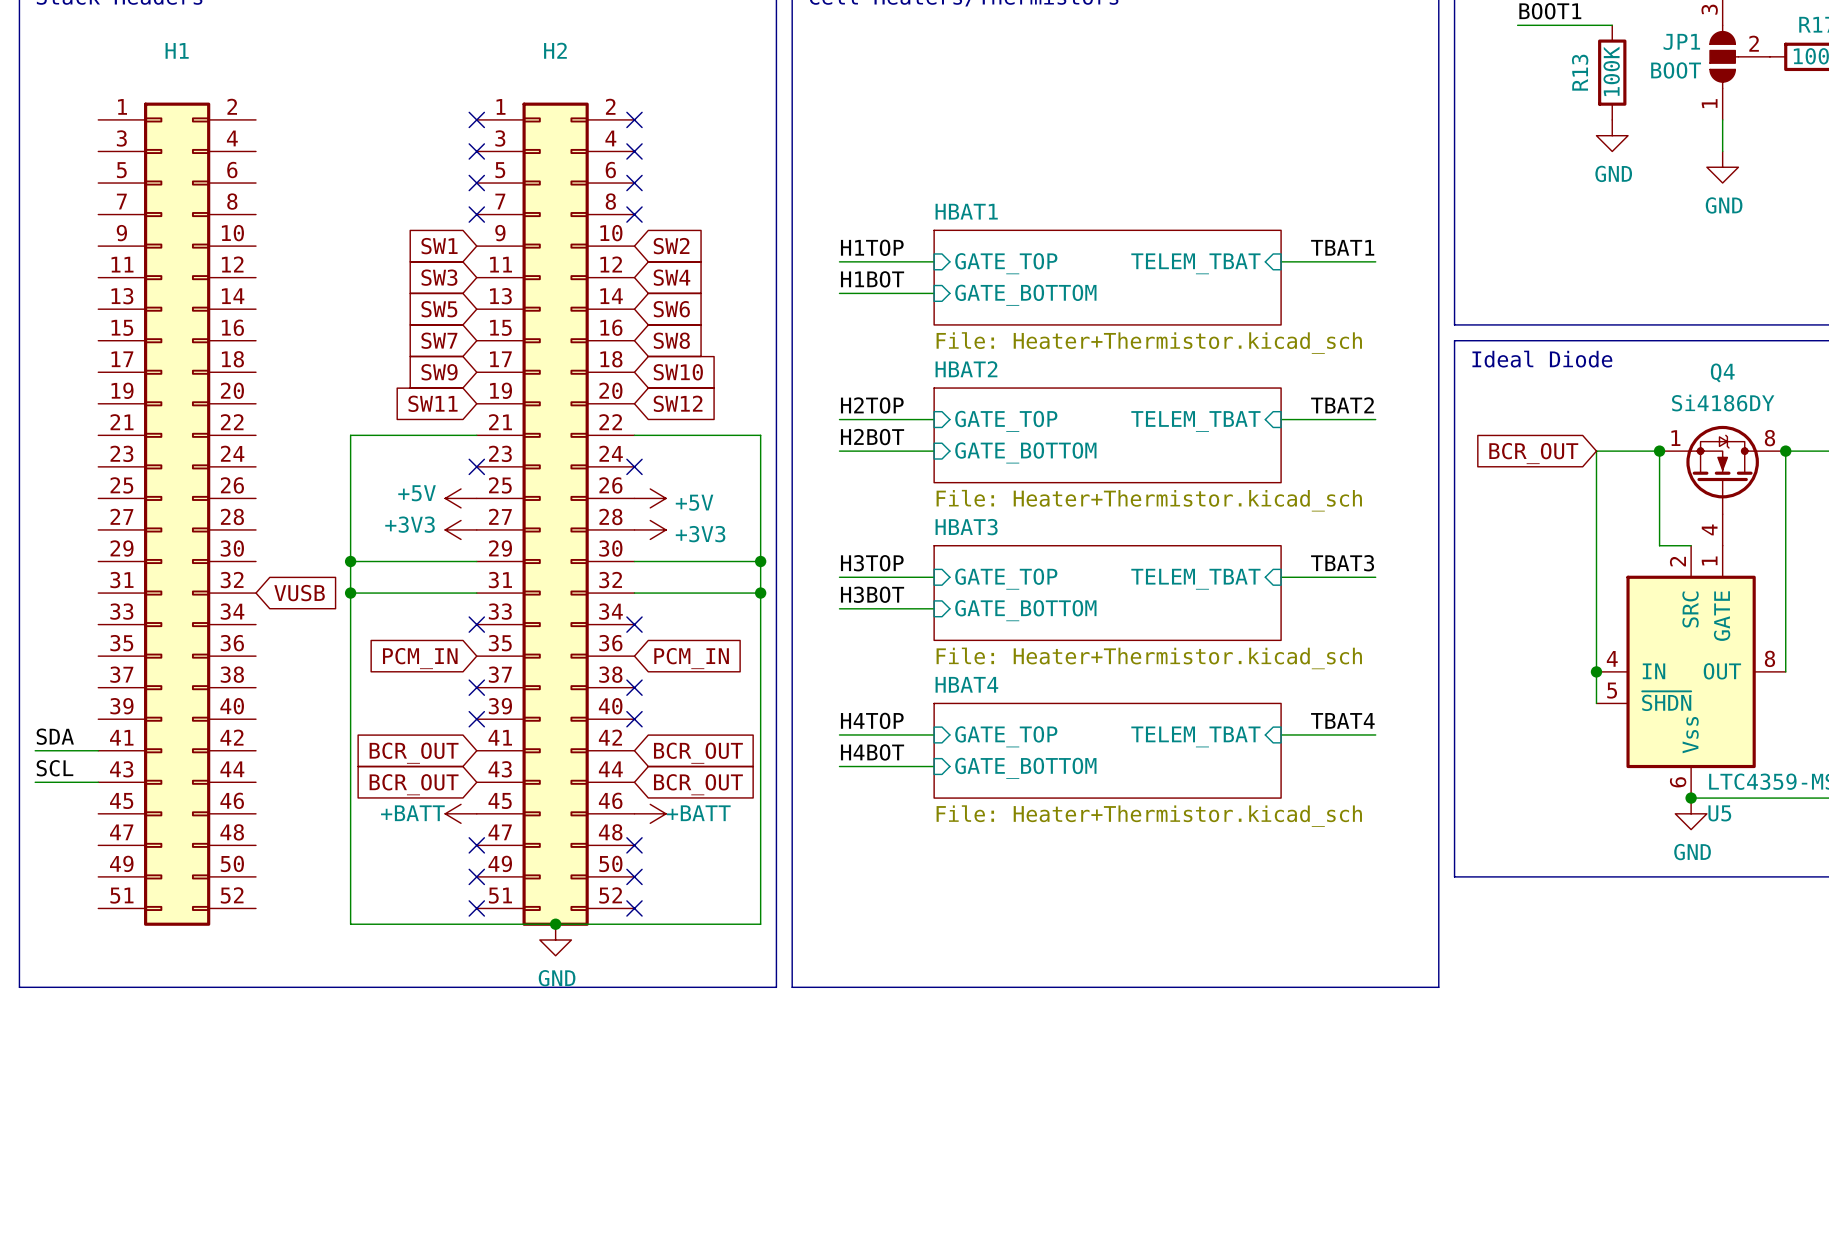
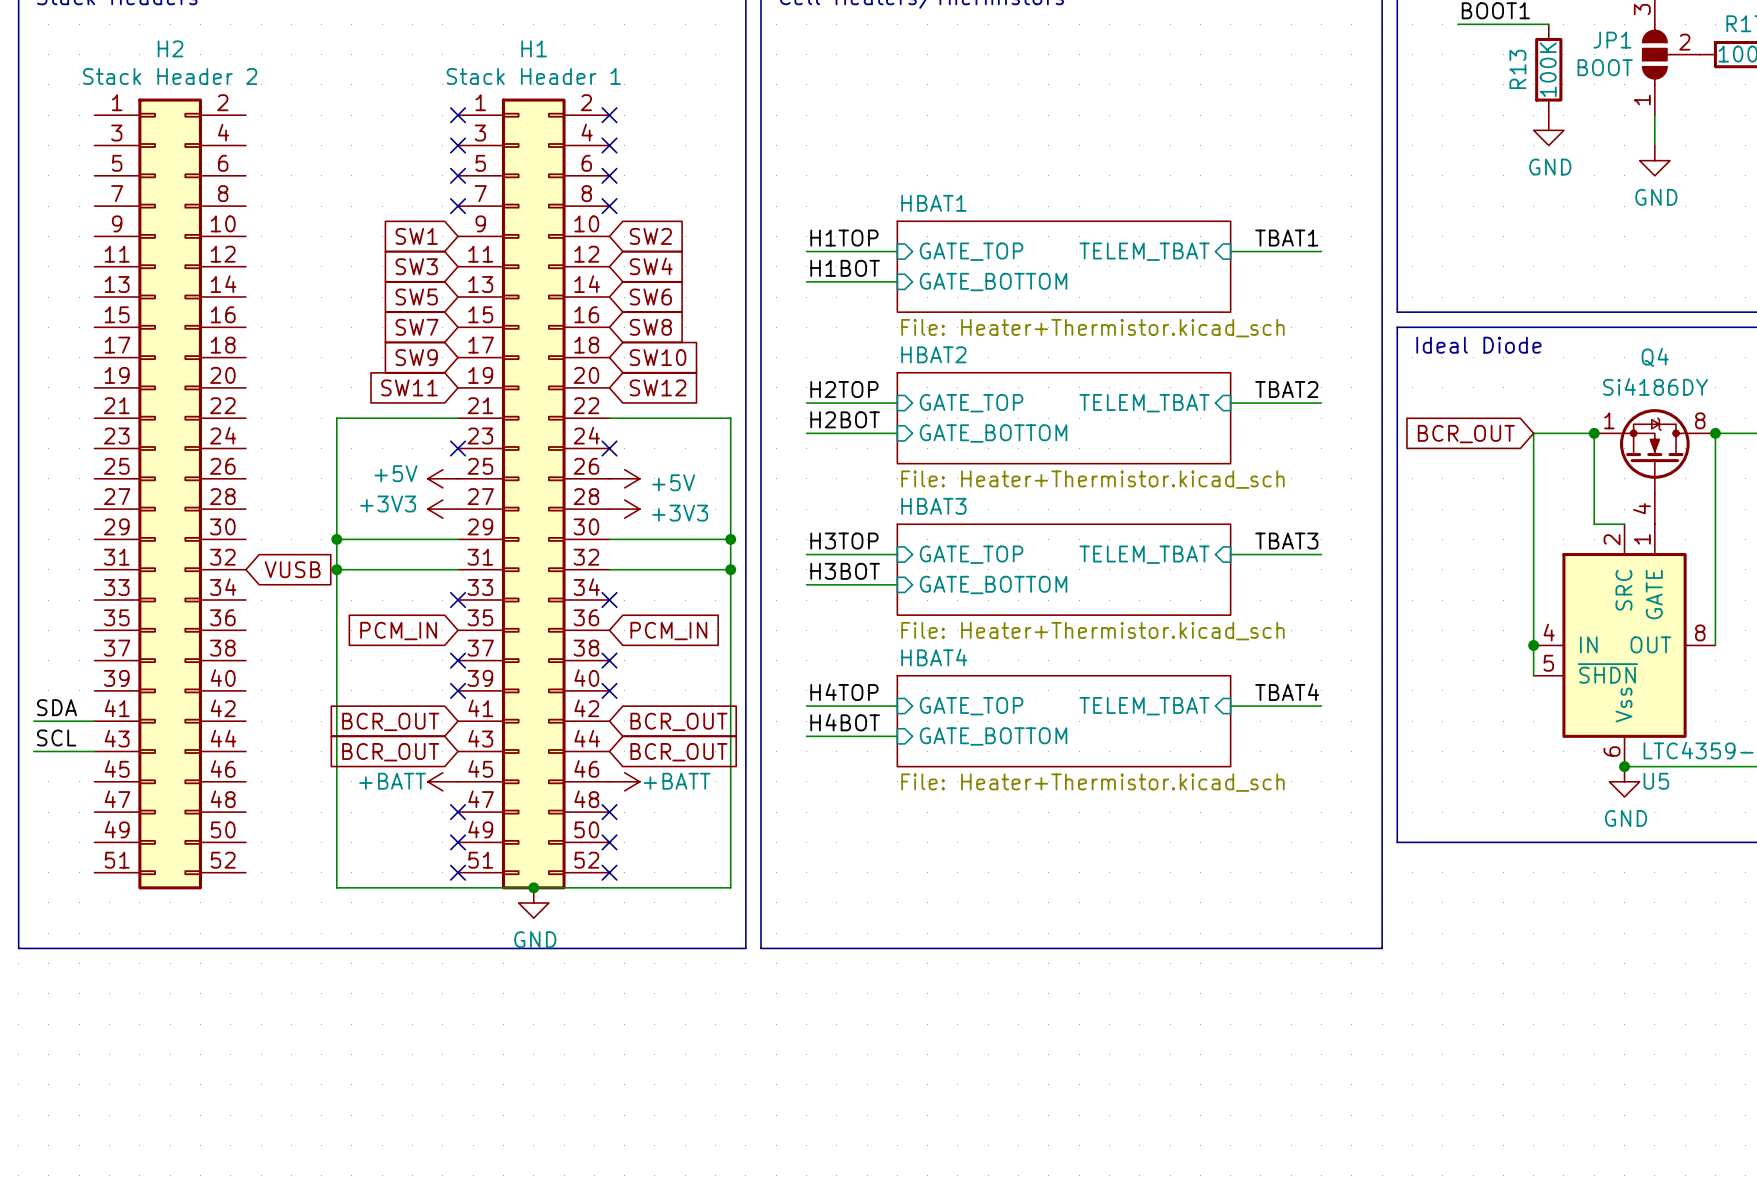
H1 name: H1 (177, 50) -> H2 (170, 48)
H2 name: H2 (555, 50) -> H1 (534, 48)
H1 value: none -> Stack Header 2 (170, 76)
H2 value: none -> Stack Header 1 (533, 76)

